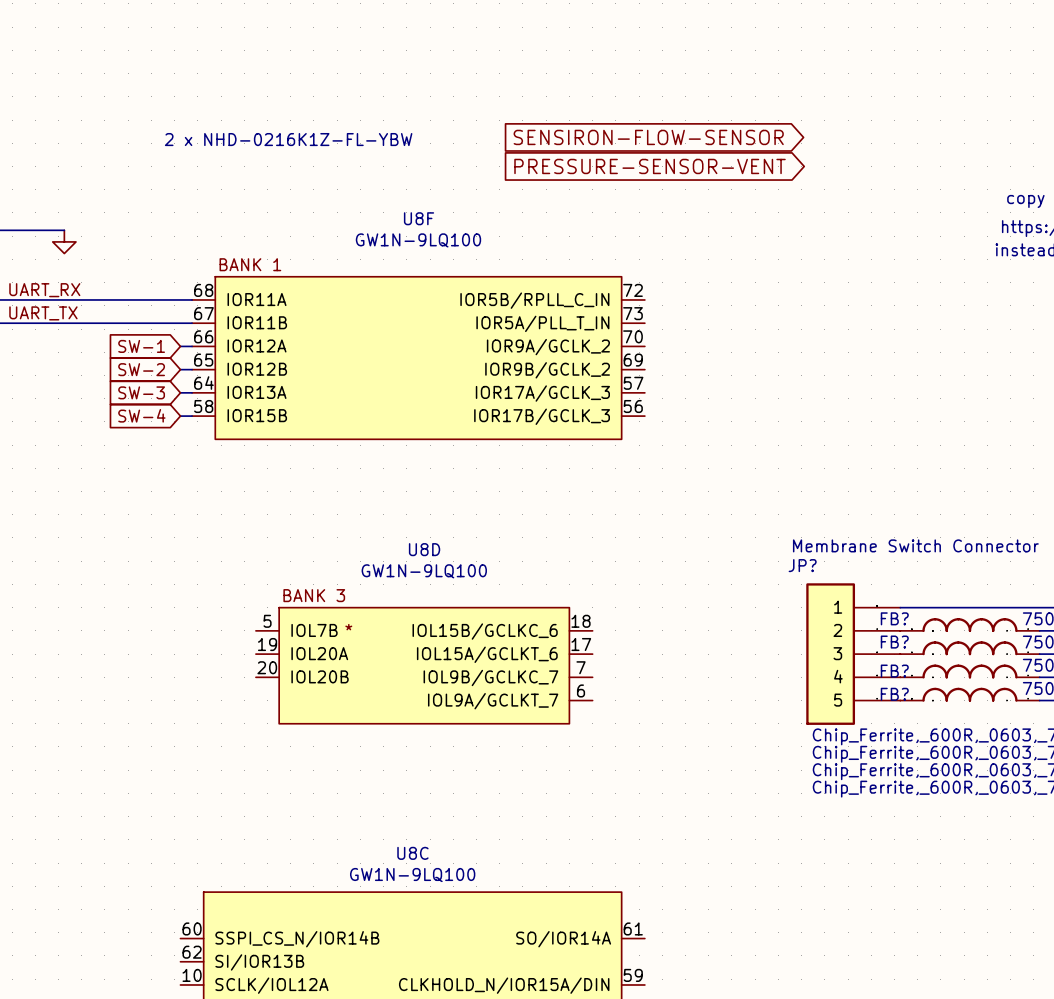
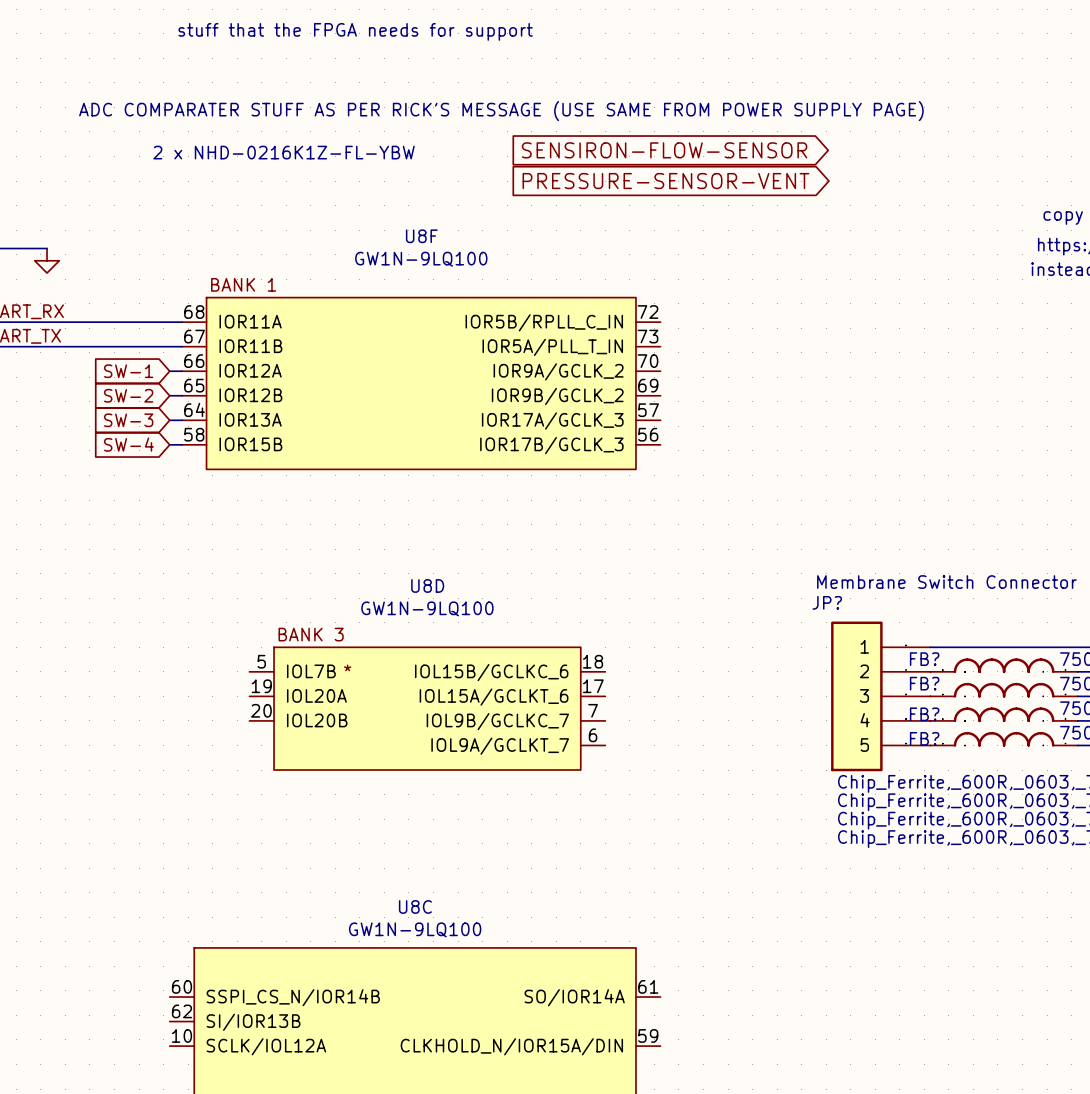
text: none -> stuff that the FPGA needs for support (355, 31)
text: none -> ADC COMPARATER STUFF AS PER RICK'S MESSAGE (USE SAME FROM POWER SUPPLY PAGE) (501, 111)

